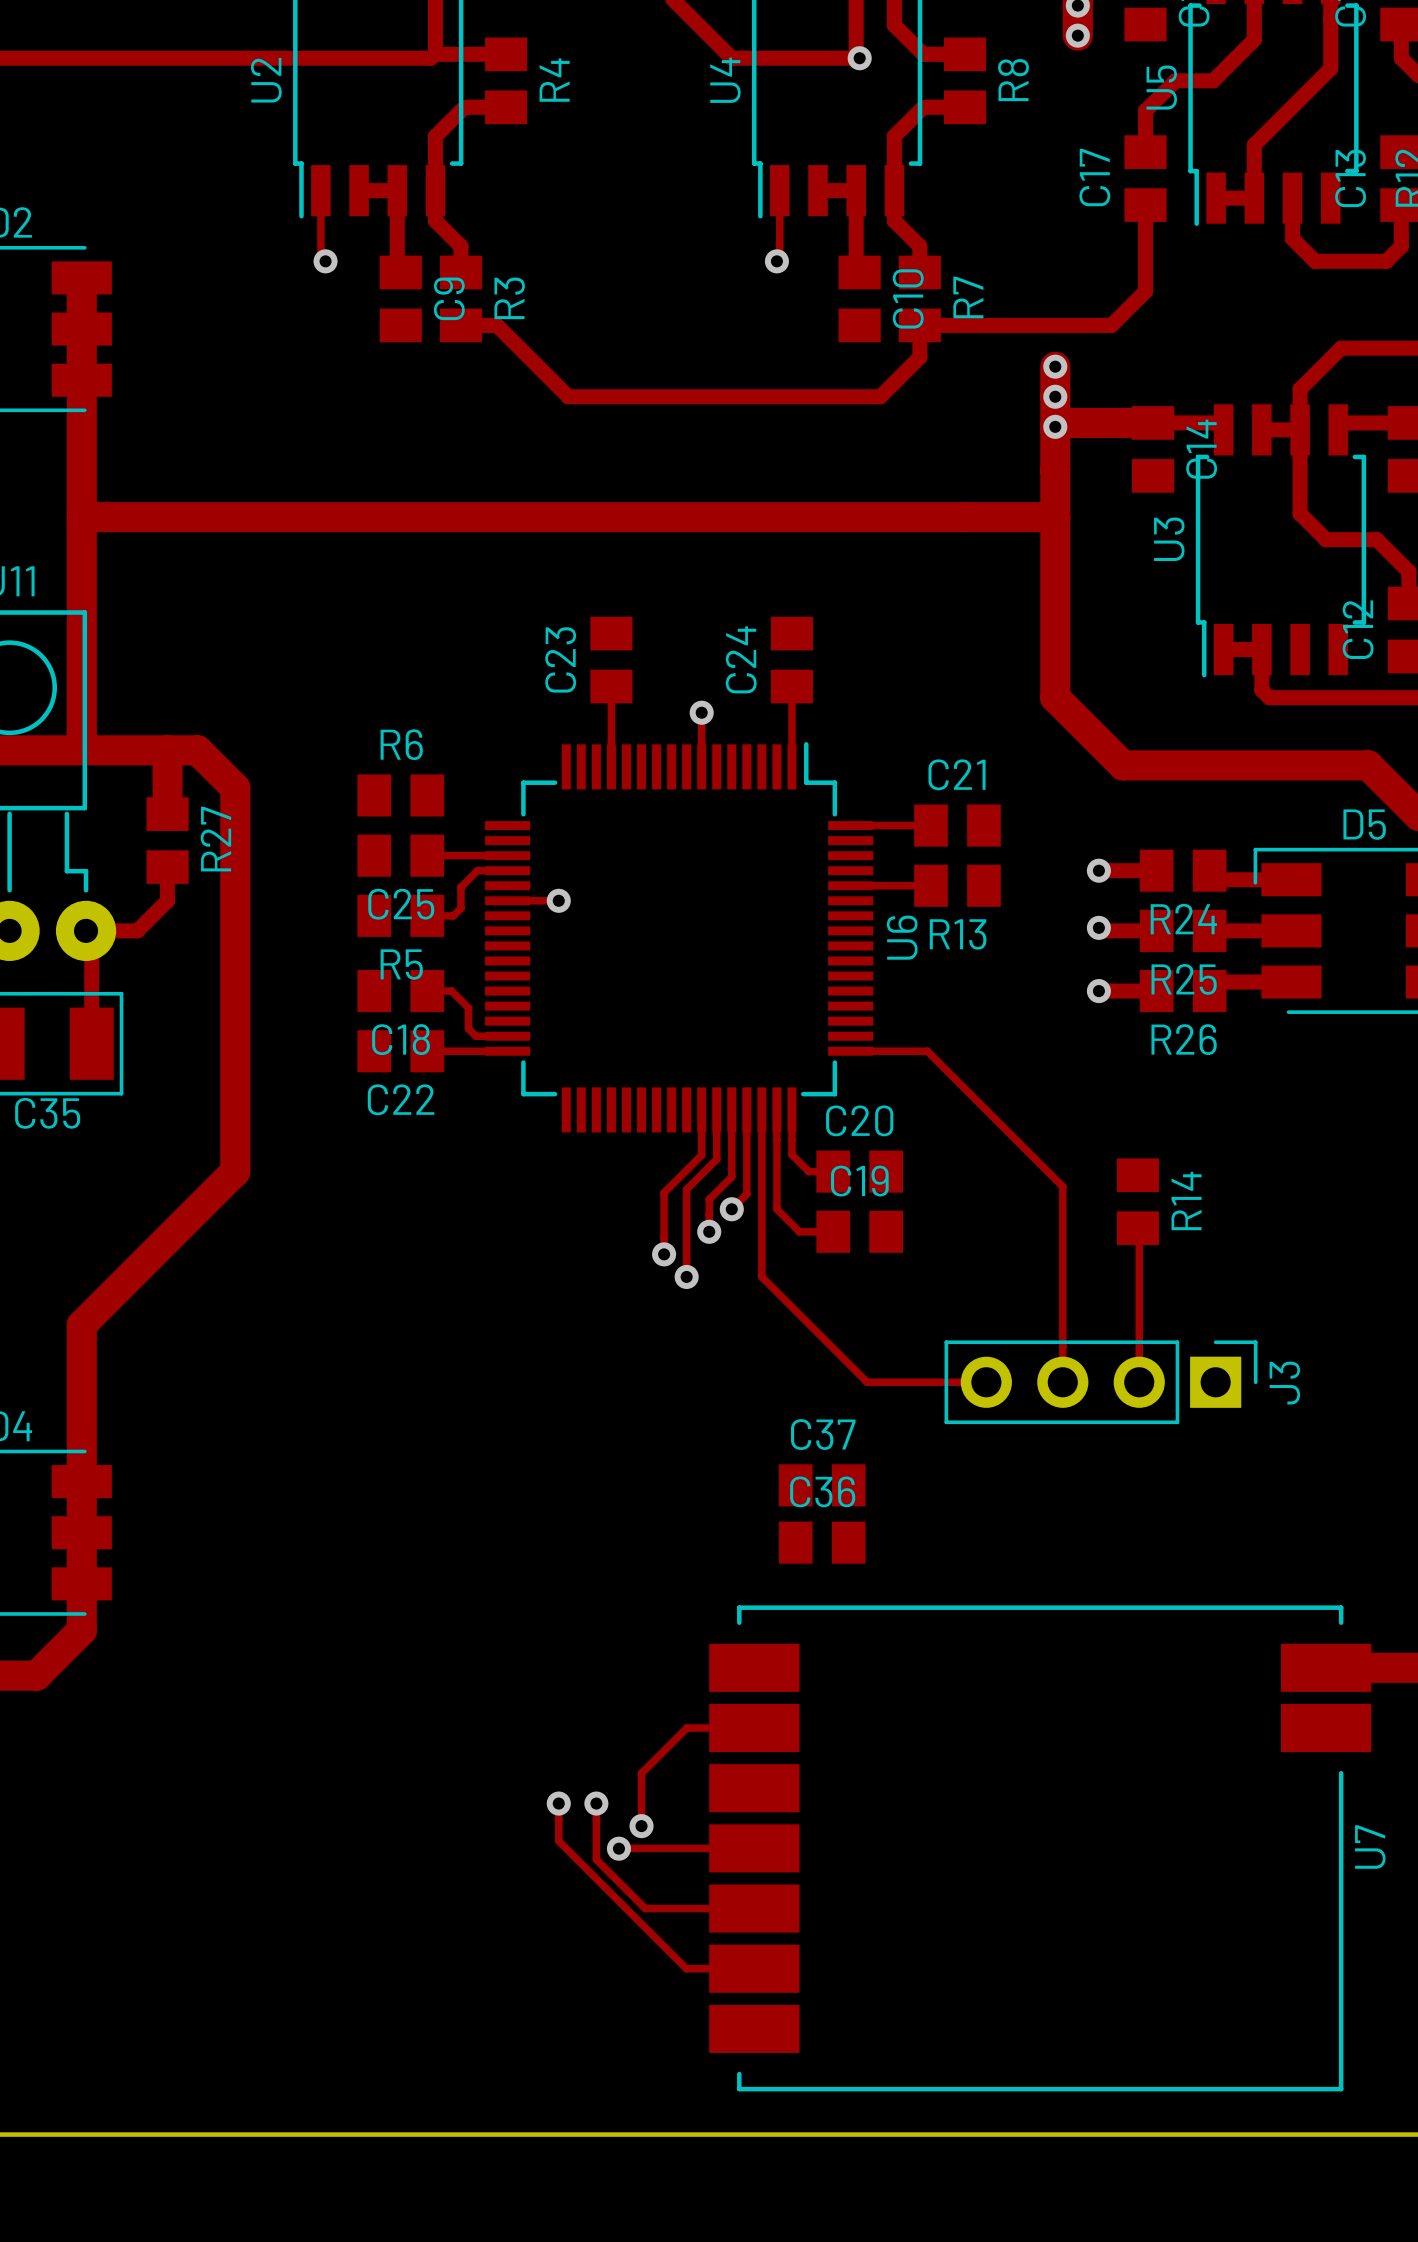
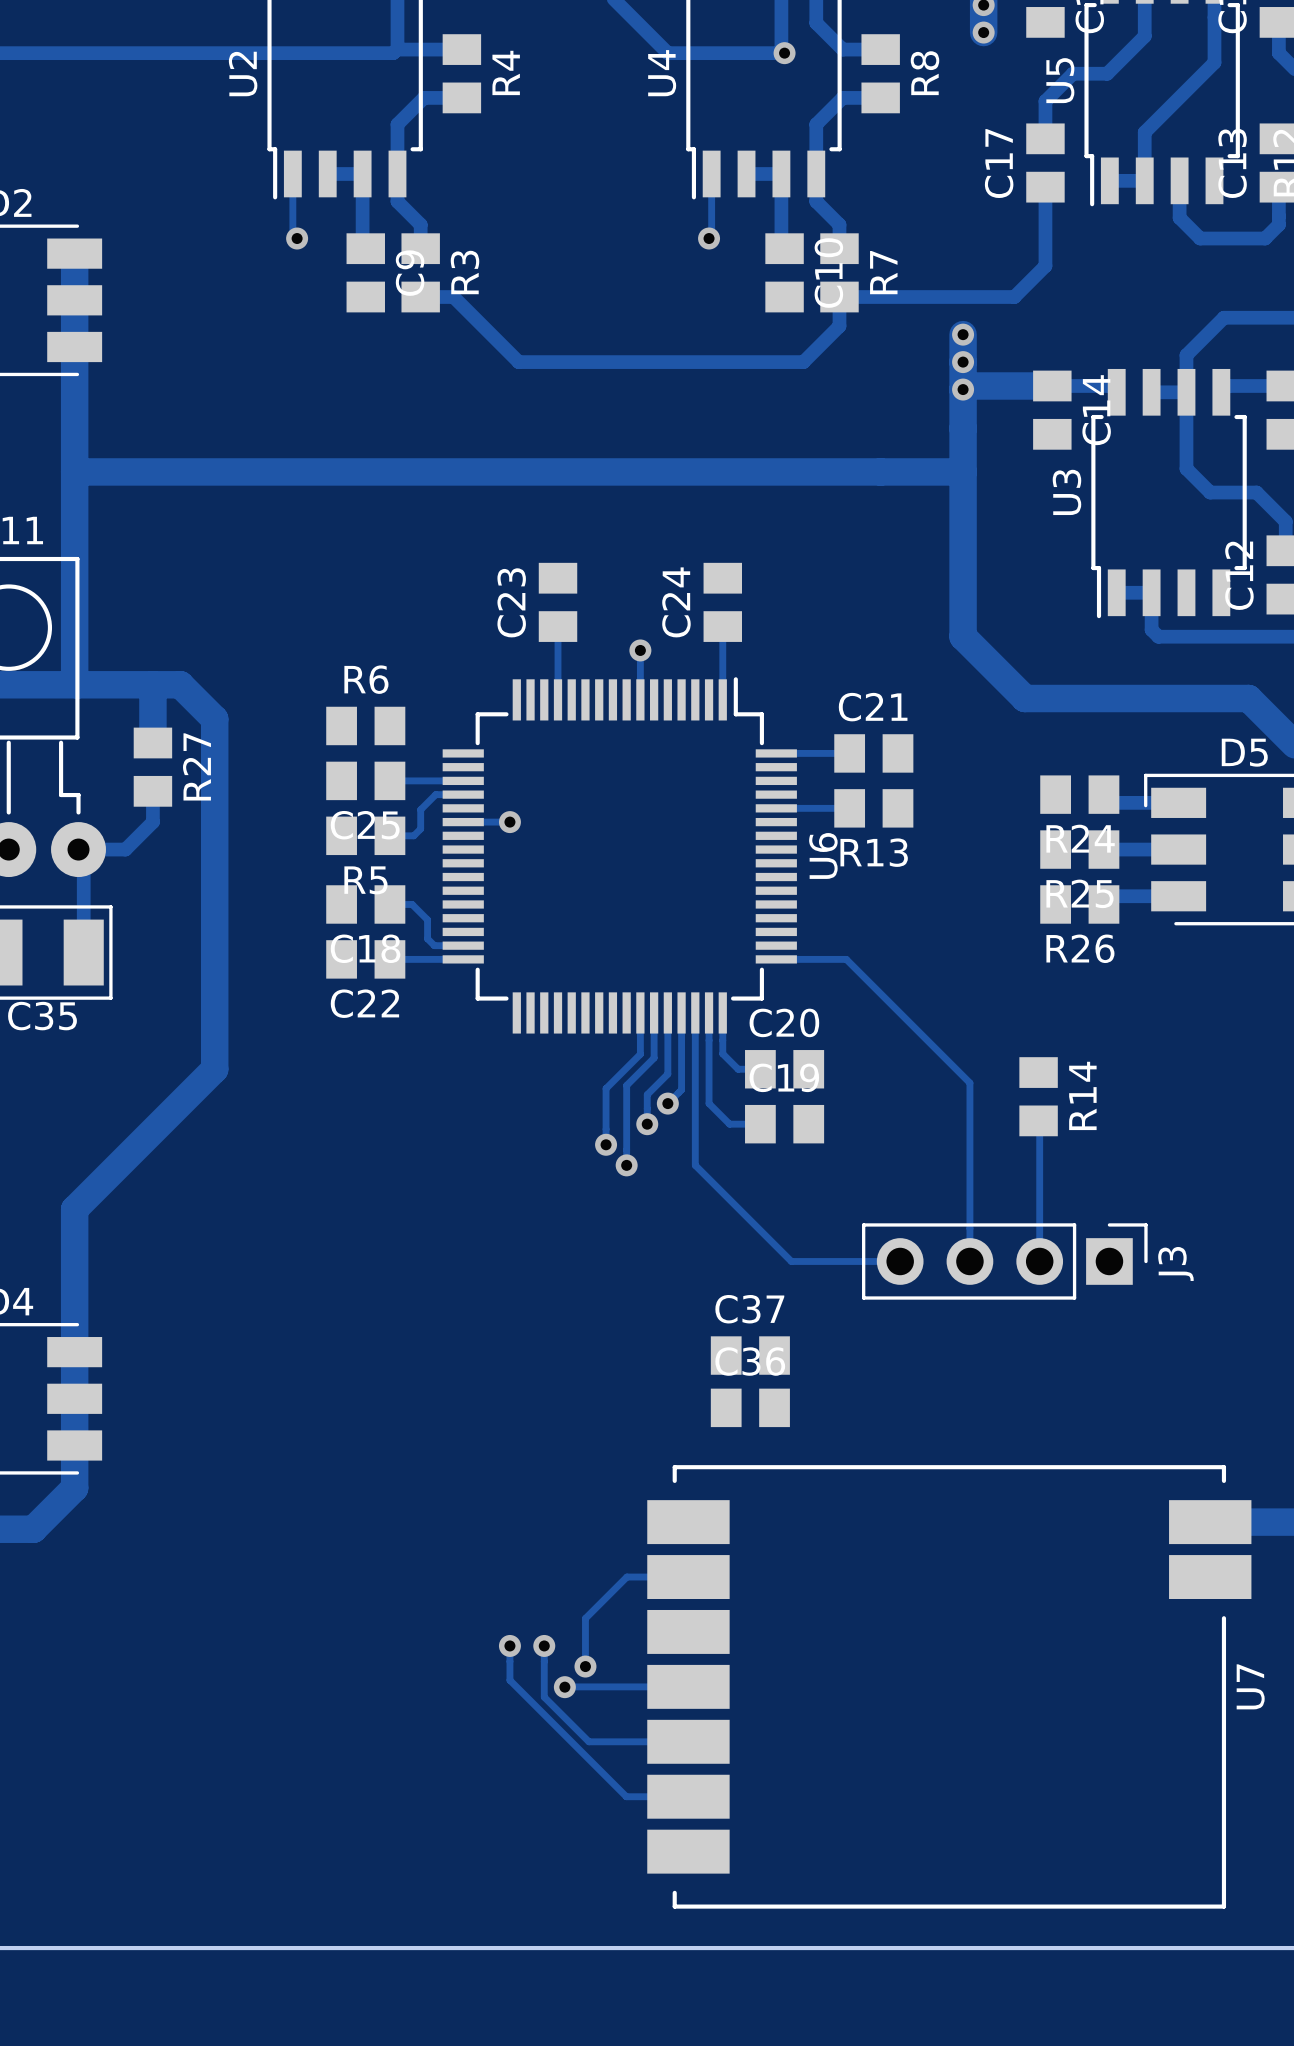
track: (1098, 870) (1156, 870) -> none
via: (1098, 870) -> none
track: (1098, 927) (1101, 930) (1156, 930) -> none
via: (1098, 927) -> none
track: (1098, 991) (1156, 991) -> none
via: (1098, 991) -> none

